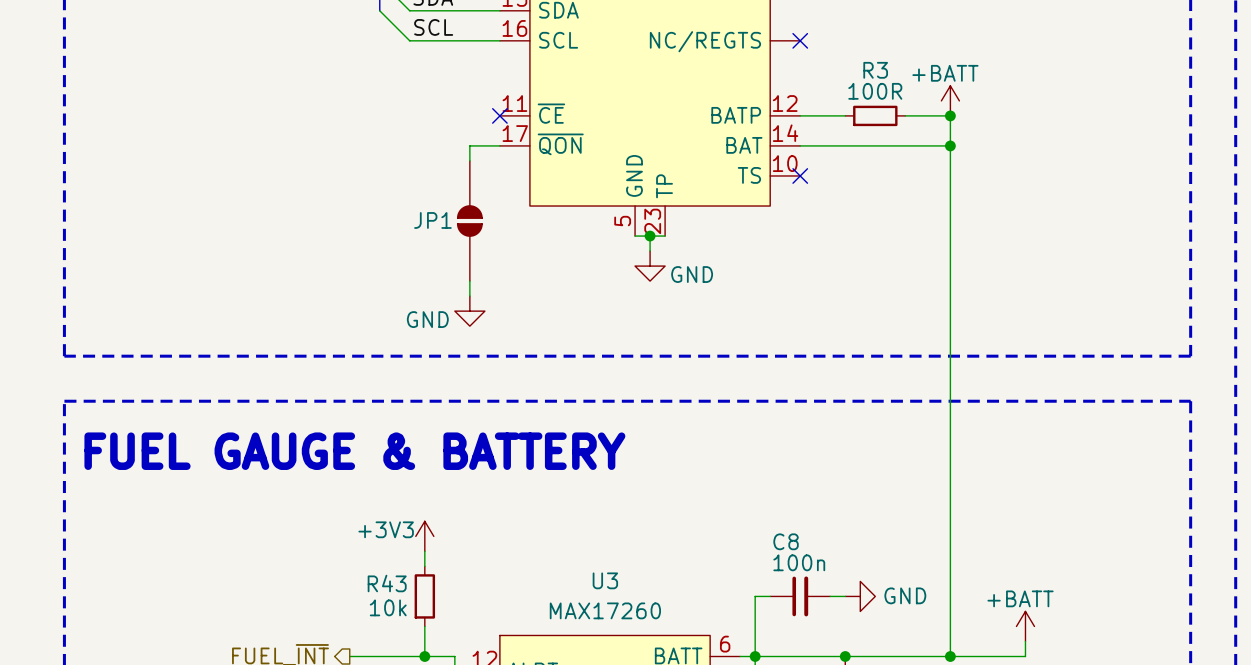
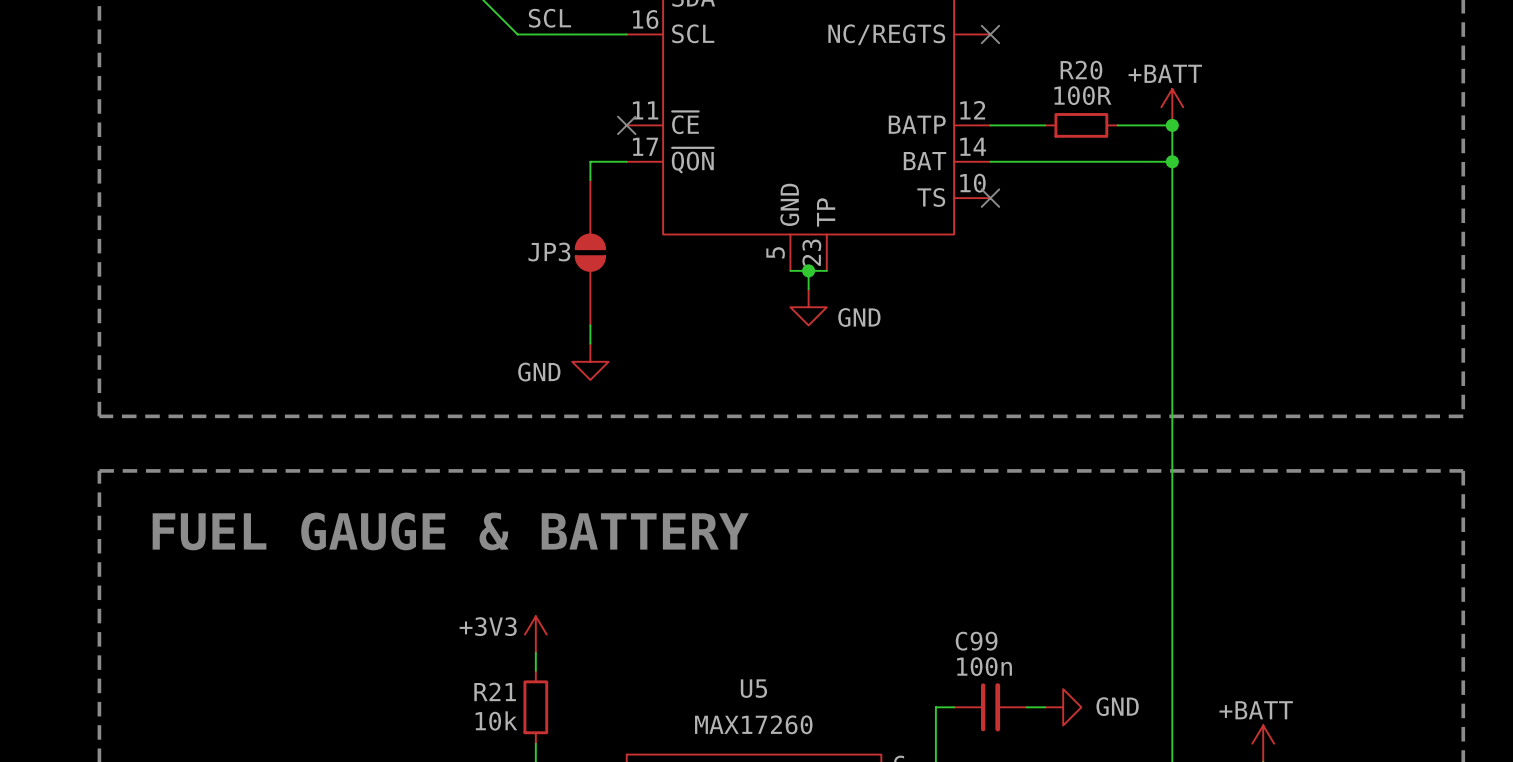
R3 name: R3 (875, 70) -> R20 (1081, 70)
JP1 name: JP1 (432, 220) -> JP3 (549, 252)
C8 name: C8 (786, 541) -> C99 (976, 641)
U3 name: U3 (605, 580) -> U5 (753, 688)
R43 name: R43 (387, 583) -> R21 (495, 691)

